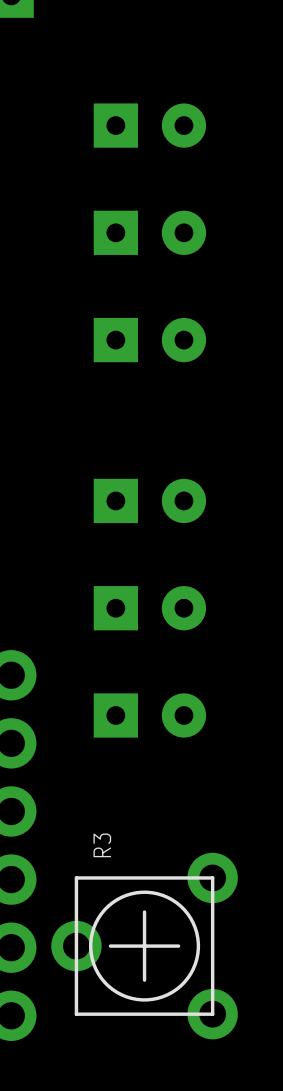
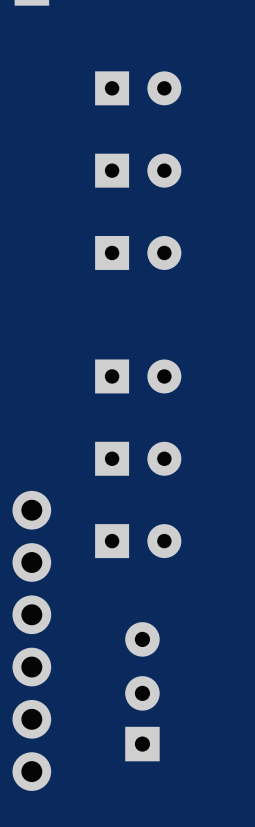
part: none -> (142, 691)
R3: (144, 946) -> none

